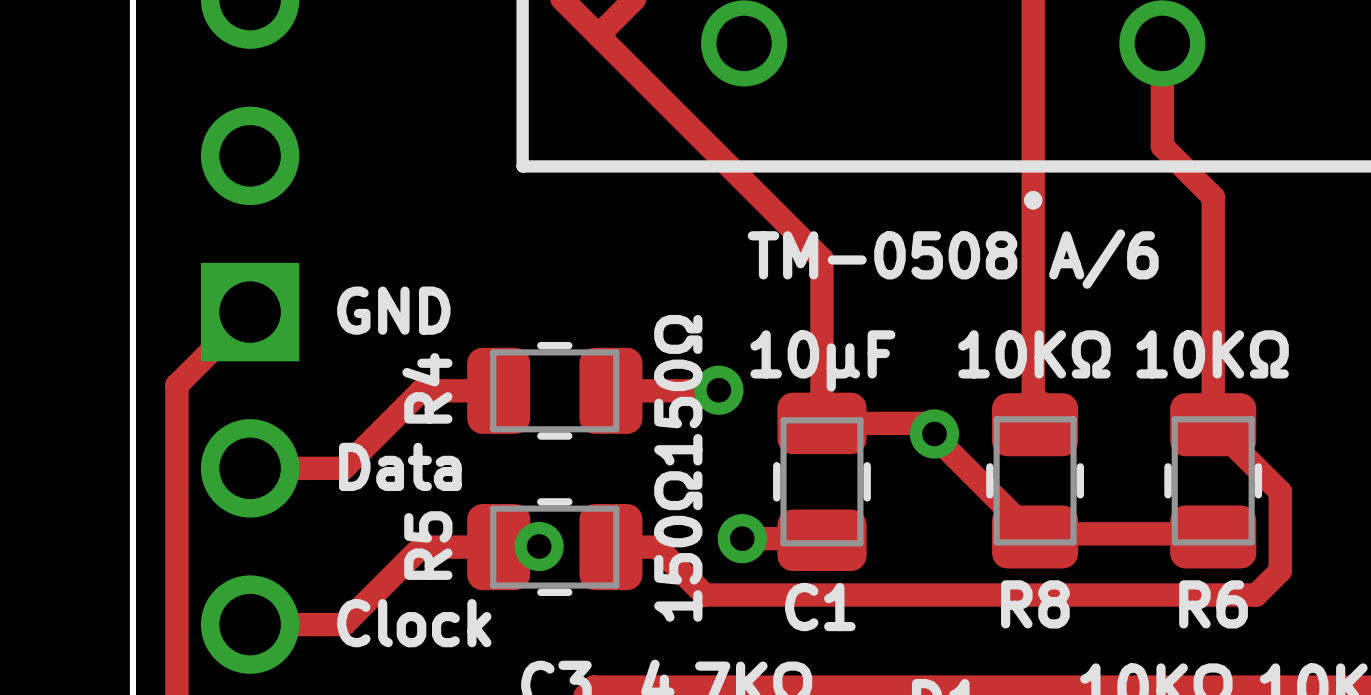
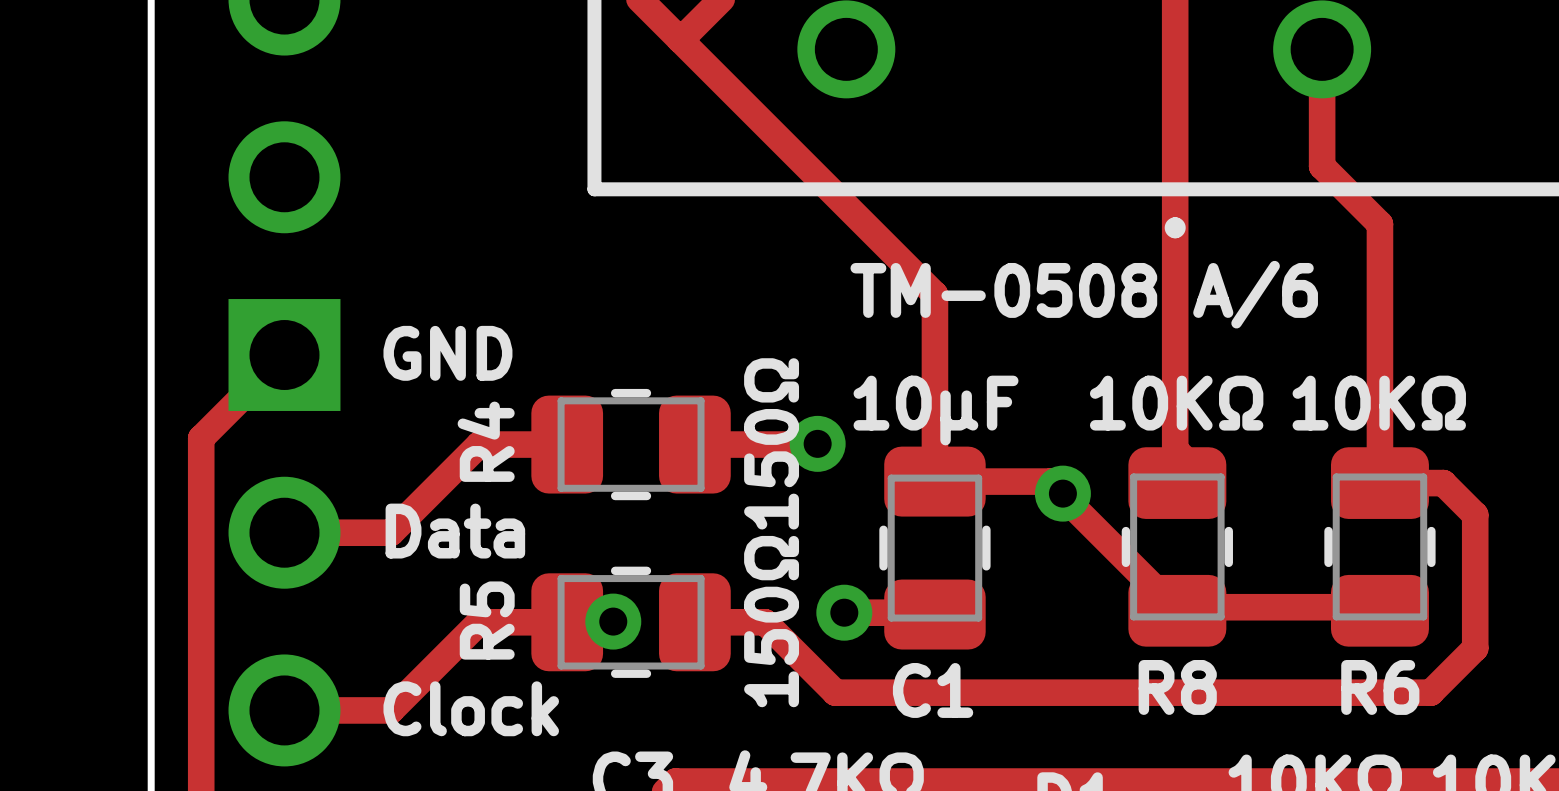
track: (1213, 424) (1280, 491) (1280, 570) (1256, 595) (704, 595) (656, 547) -> (1379, 483) (1443, 483) (1475, 514) (1475, 648) (1430, 692) (835, 692) (765, 622) (747, 622)

